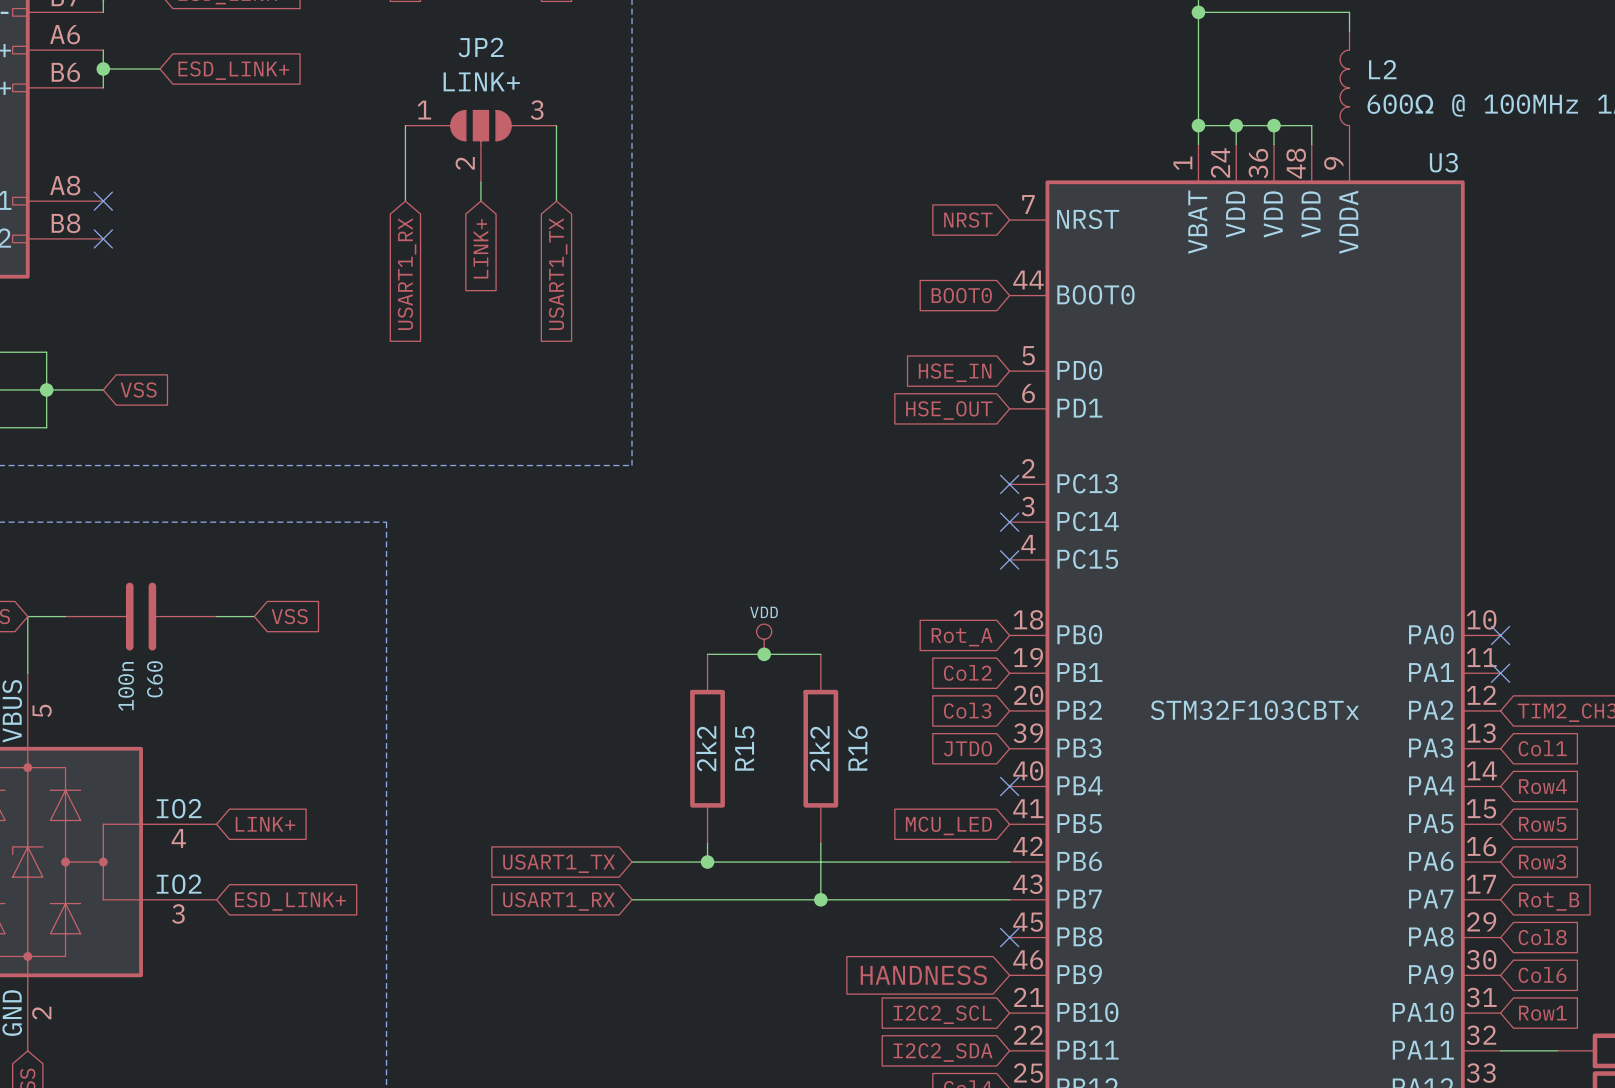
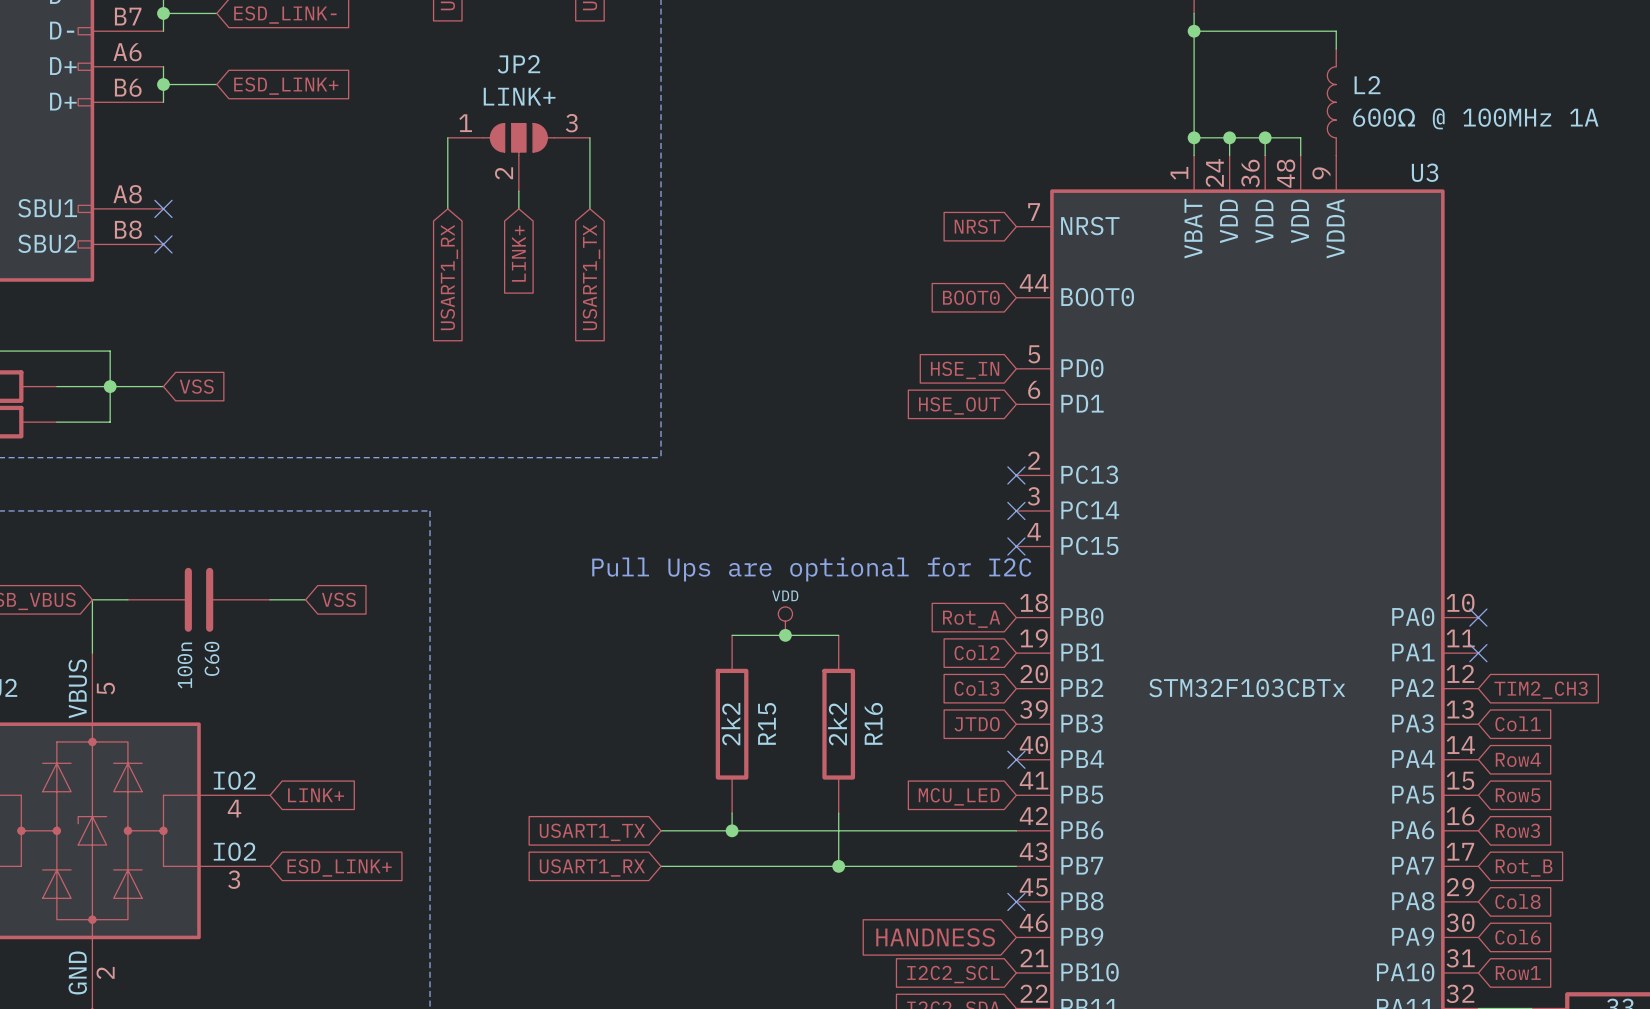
text: none -> Pull Ups are optional for I2C (811, 569)

